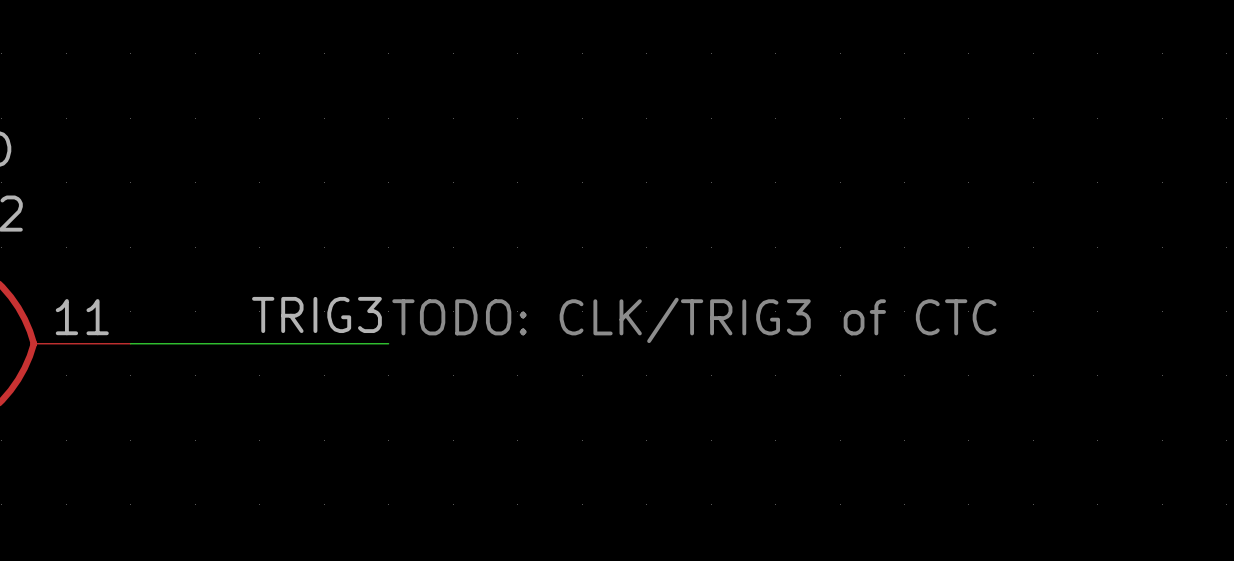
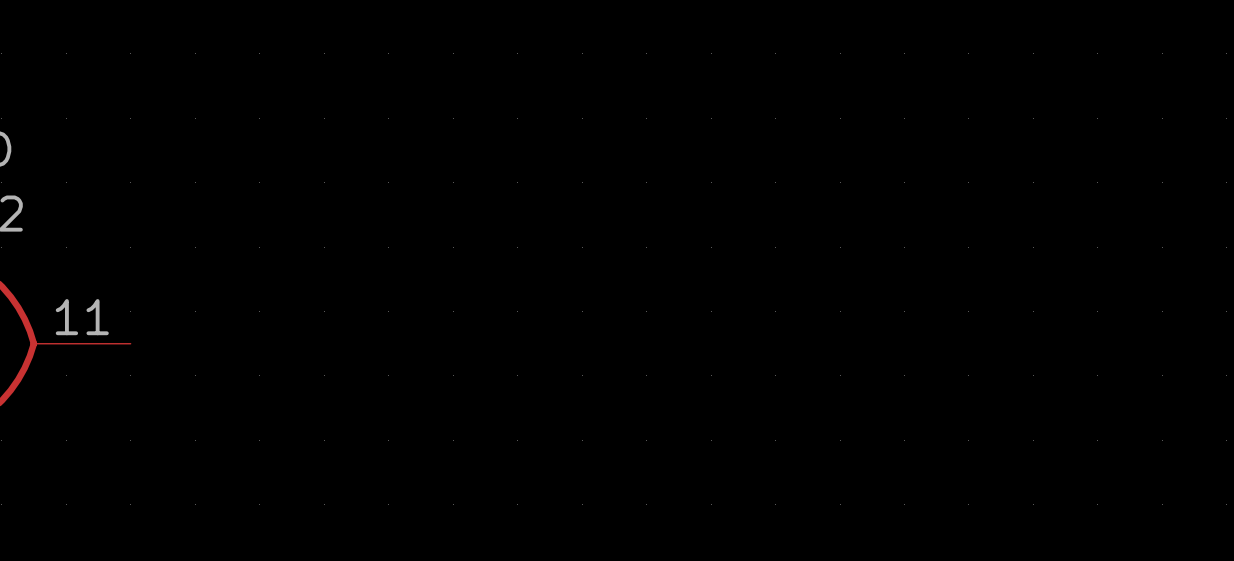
label: TRIG3 (316, 314) -> none
text: TODO: CLK/TRIG3 of CTC (694, 320) -> none
wire: (130, 343) (388, 343) -> none

